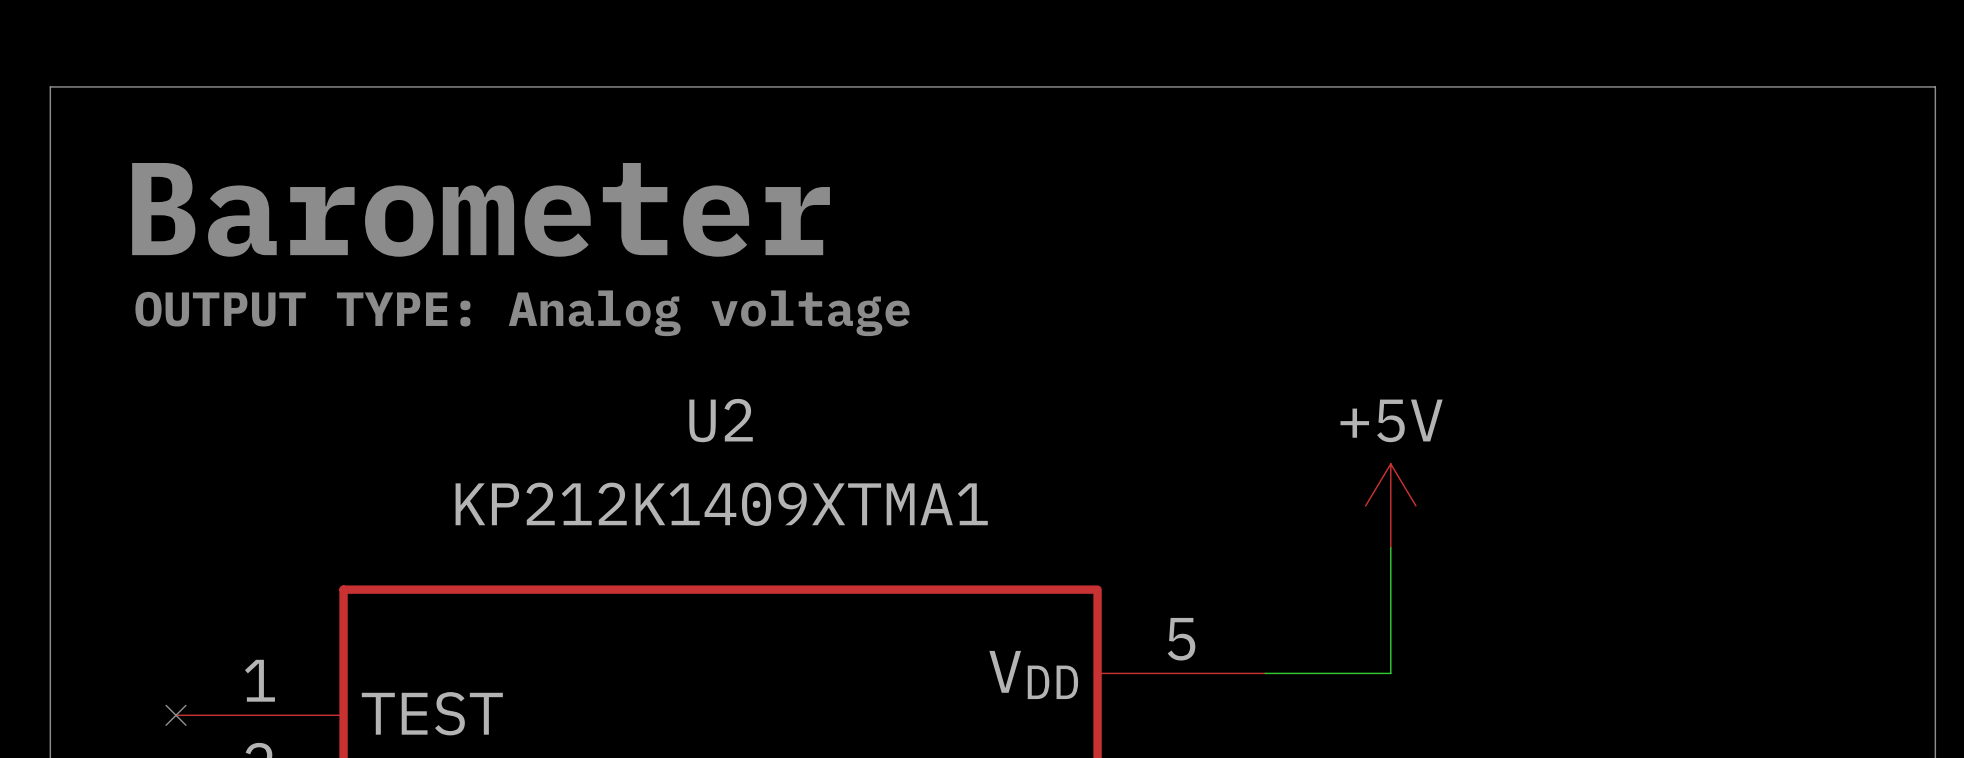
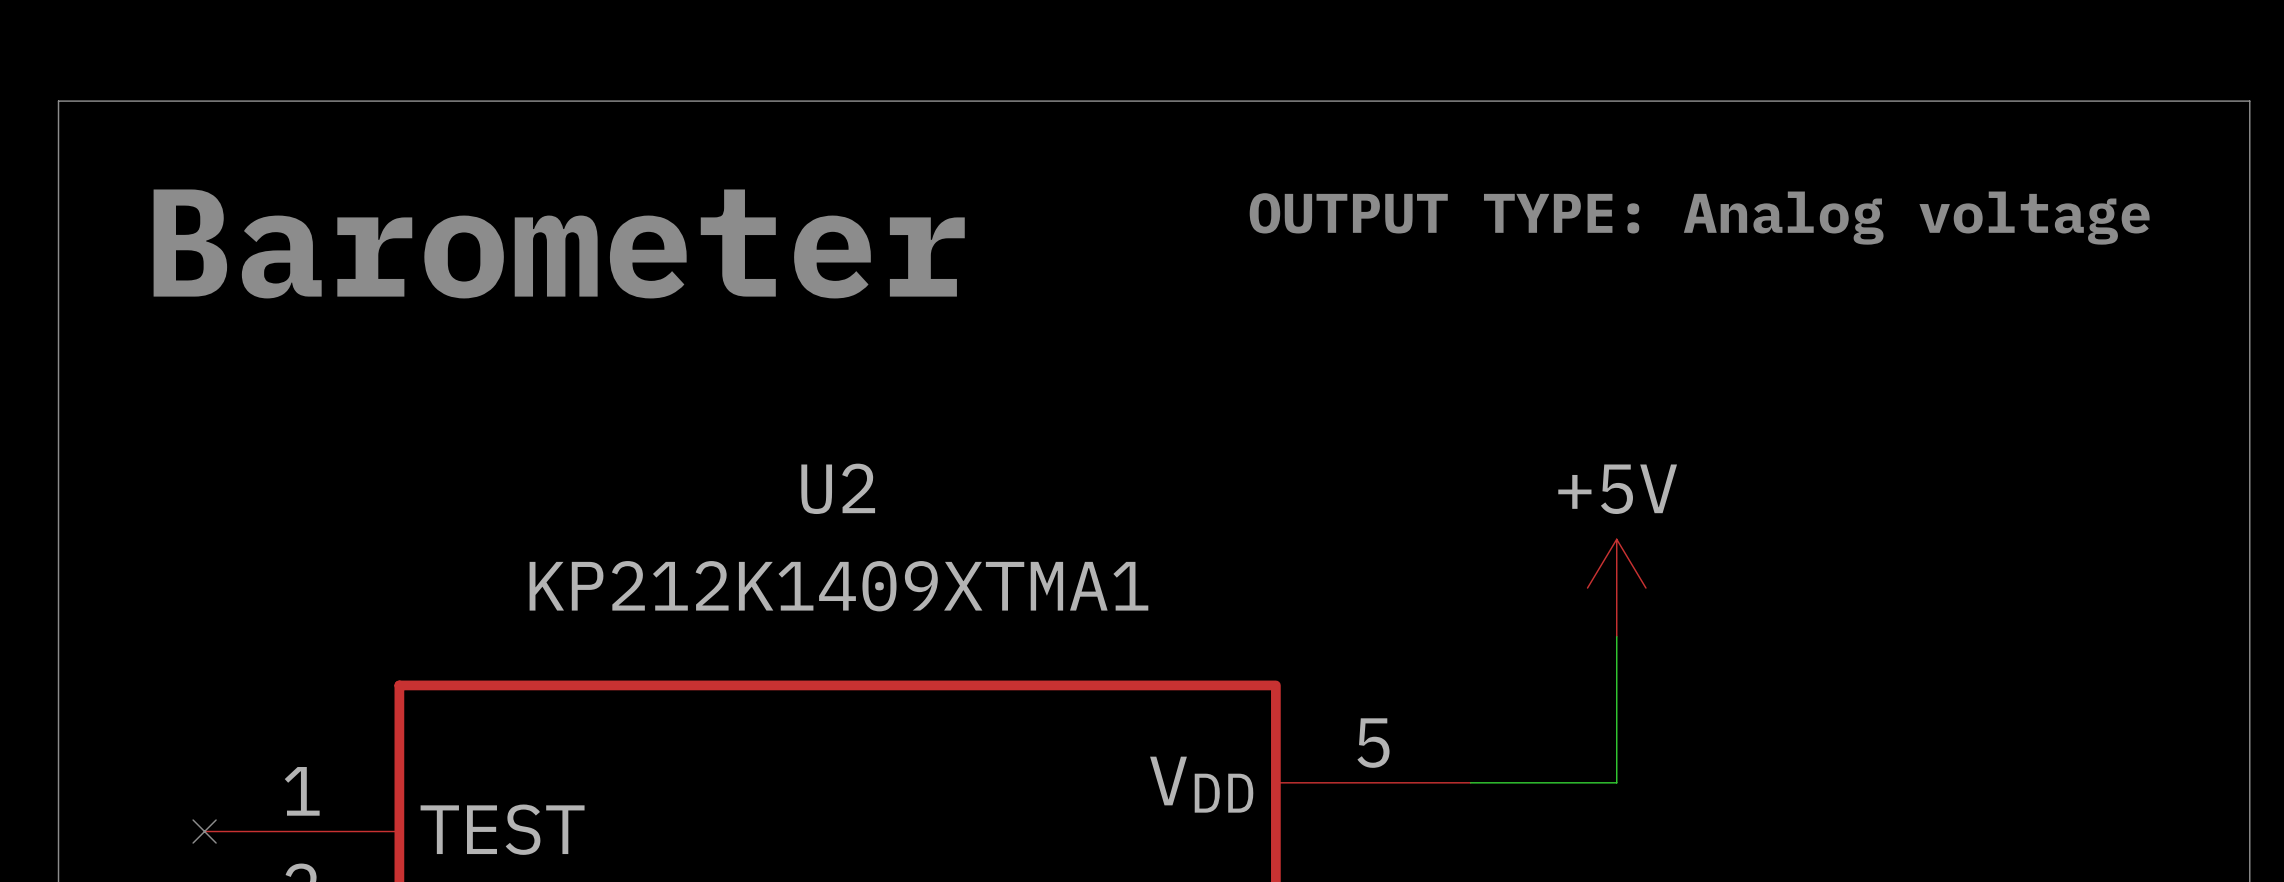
text: none -> OUTPUT TYPE: Analog voltage (1699, 218)
text: OUTPUT TYPE: Analog voltage (522, 313) -> none

